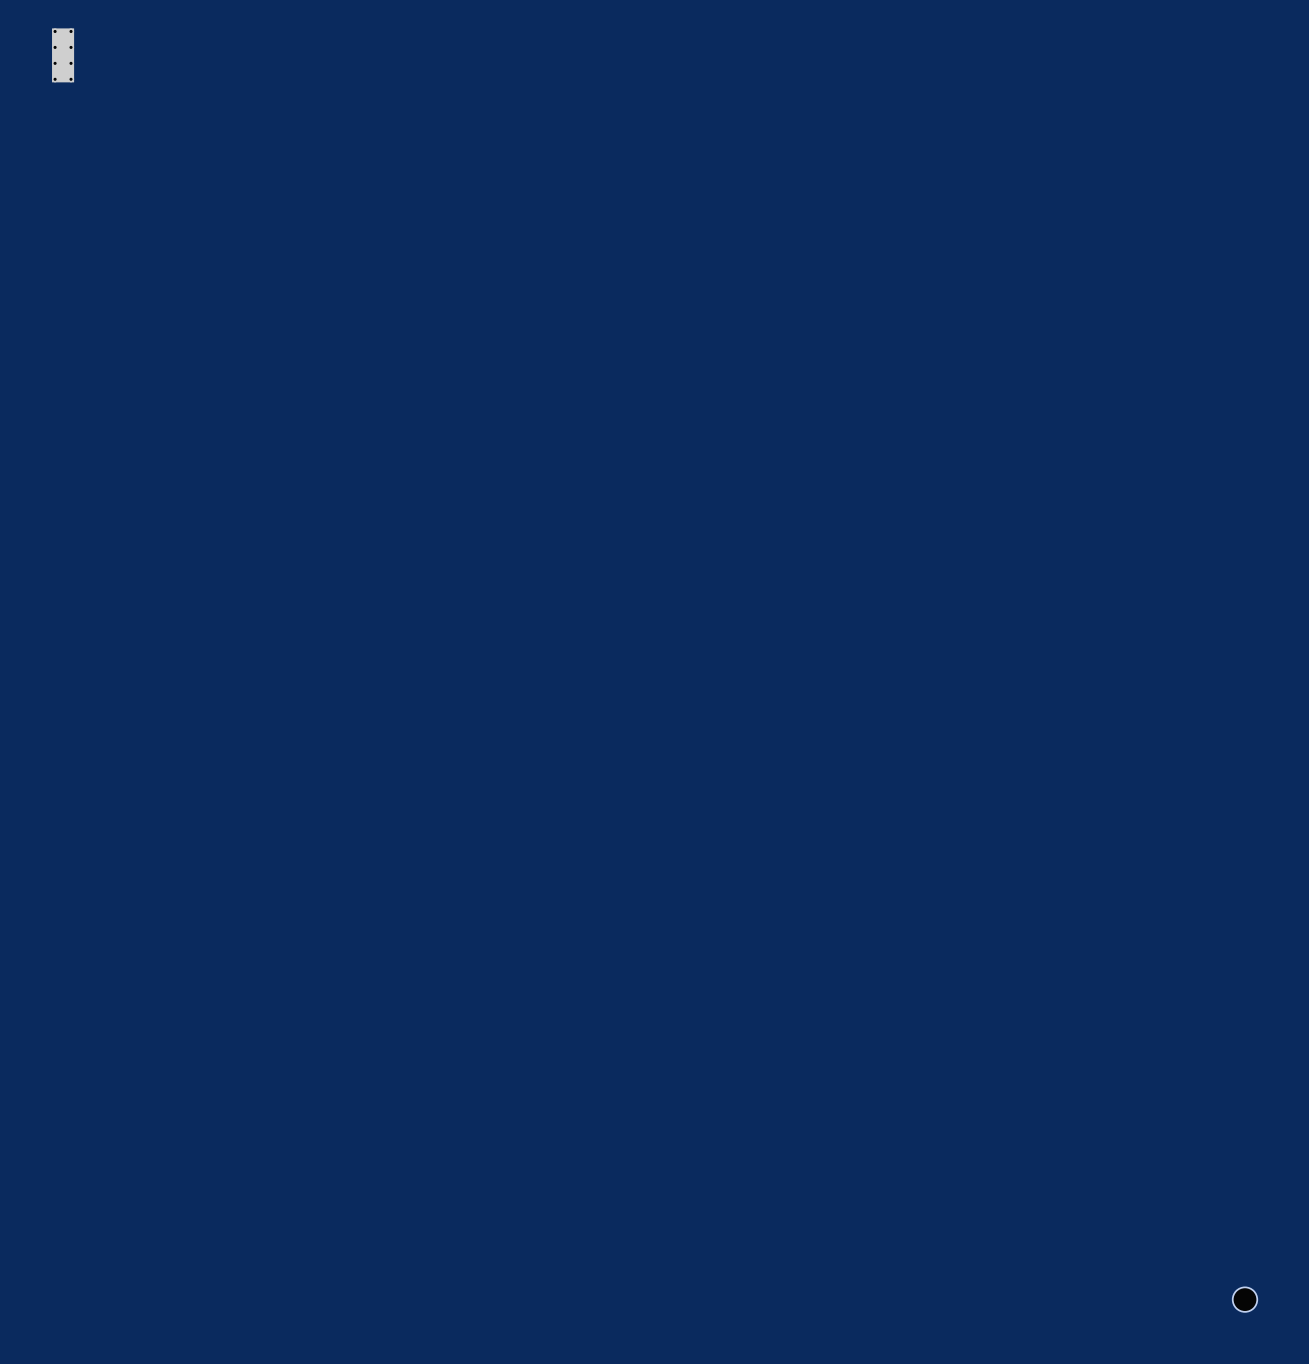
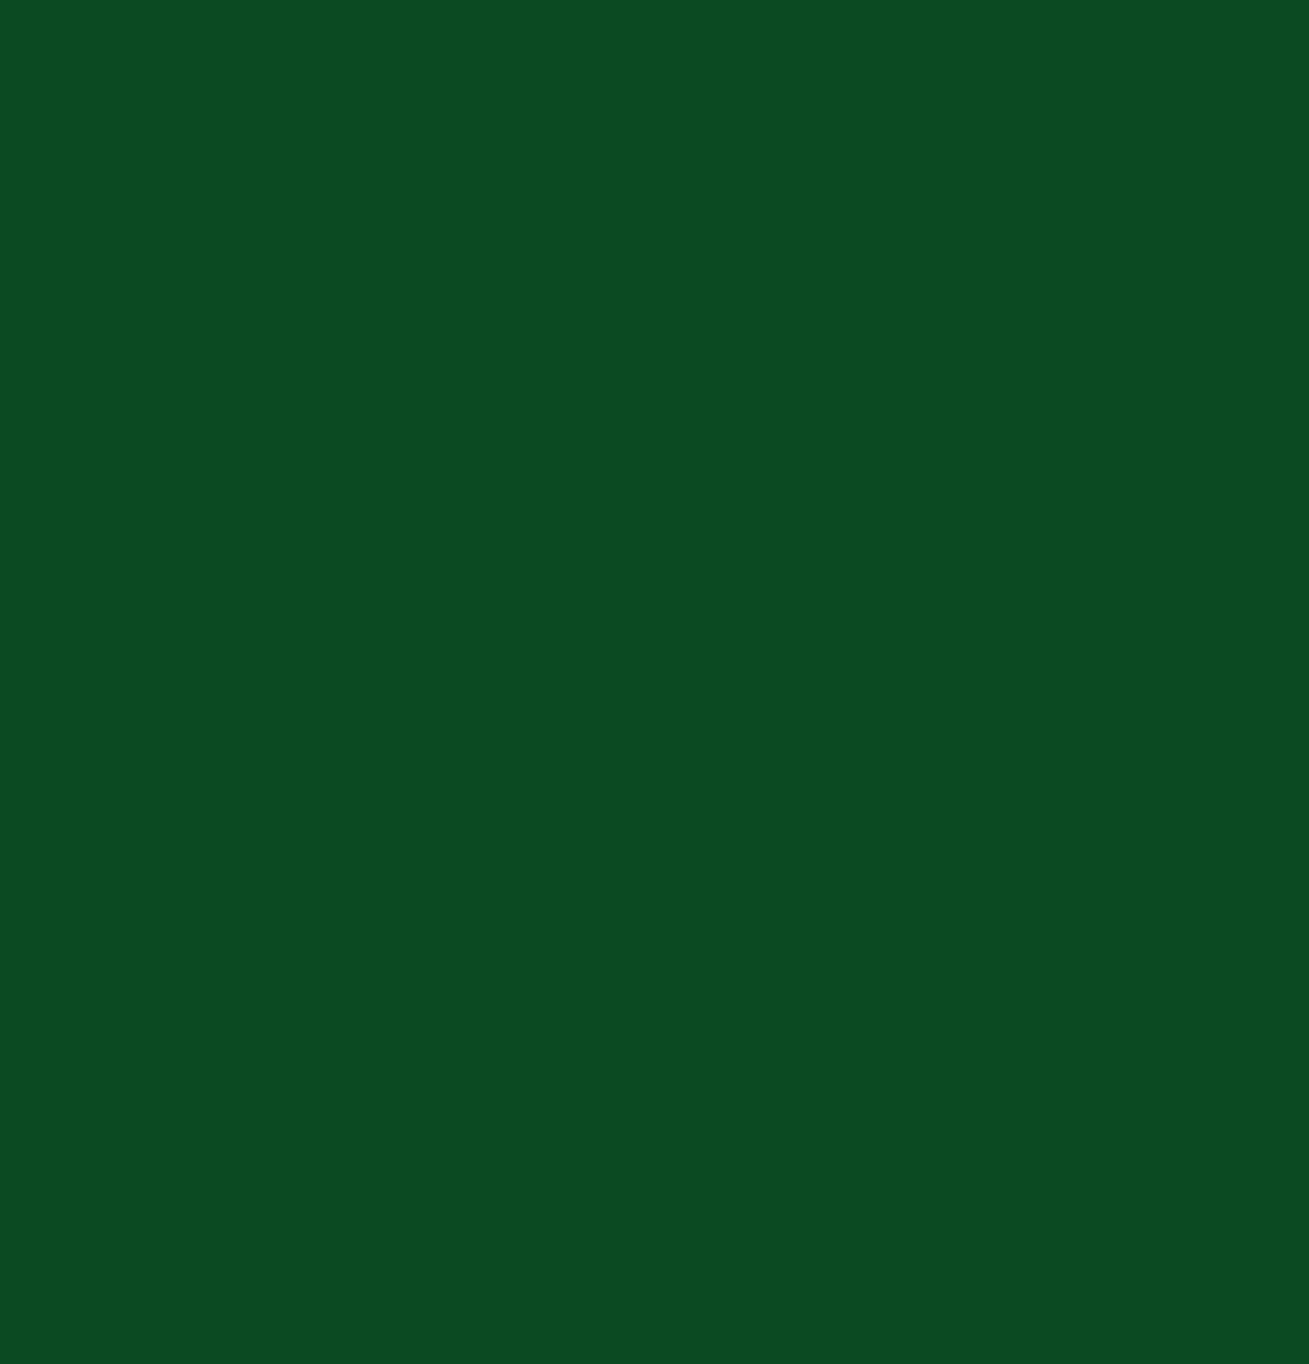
part: (63, 55) -> none
part: (1245, 1299) -> none

